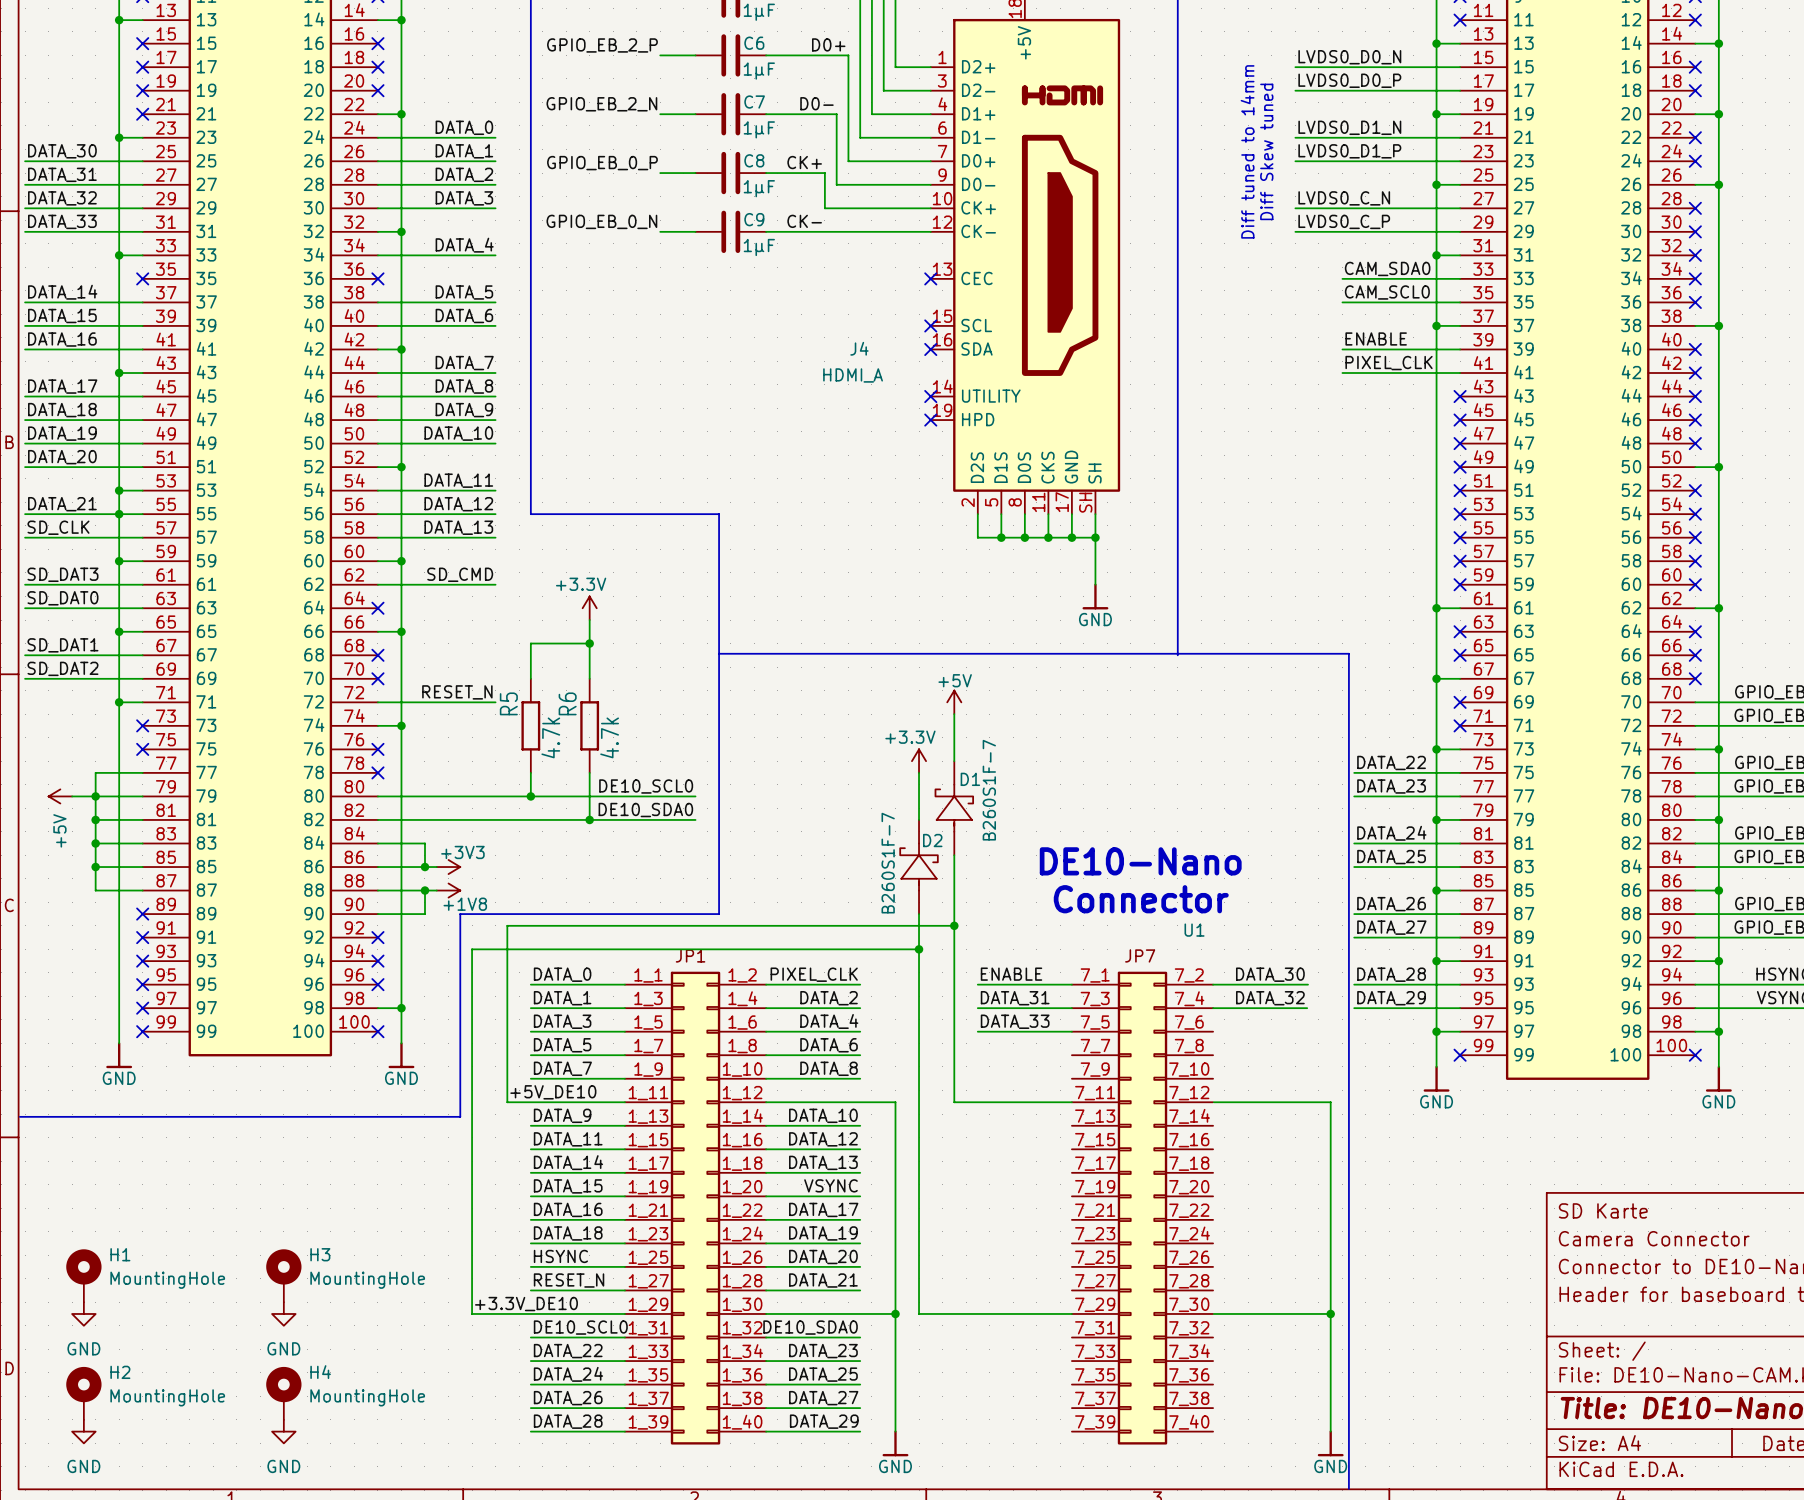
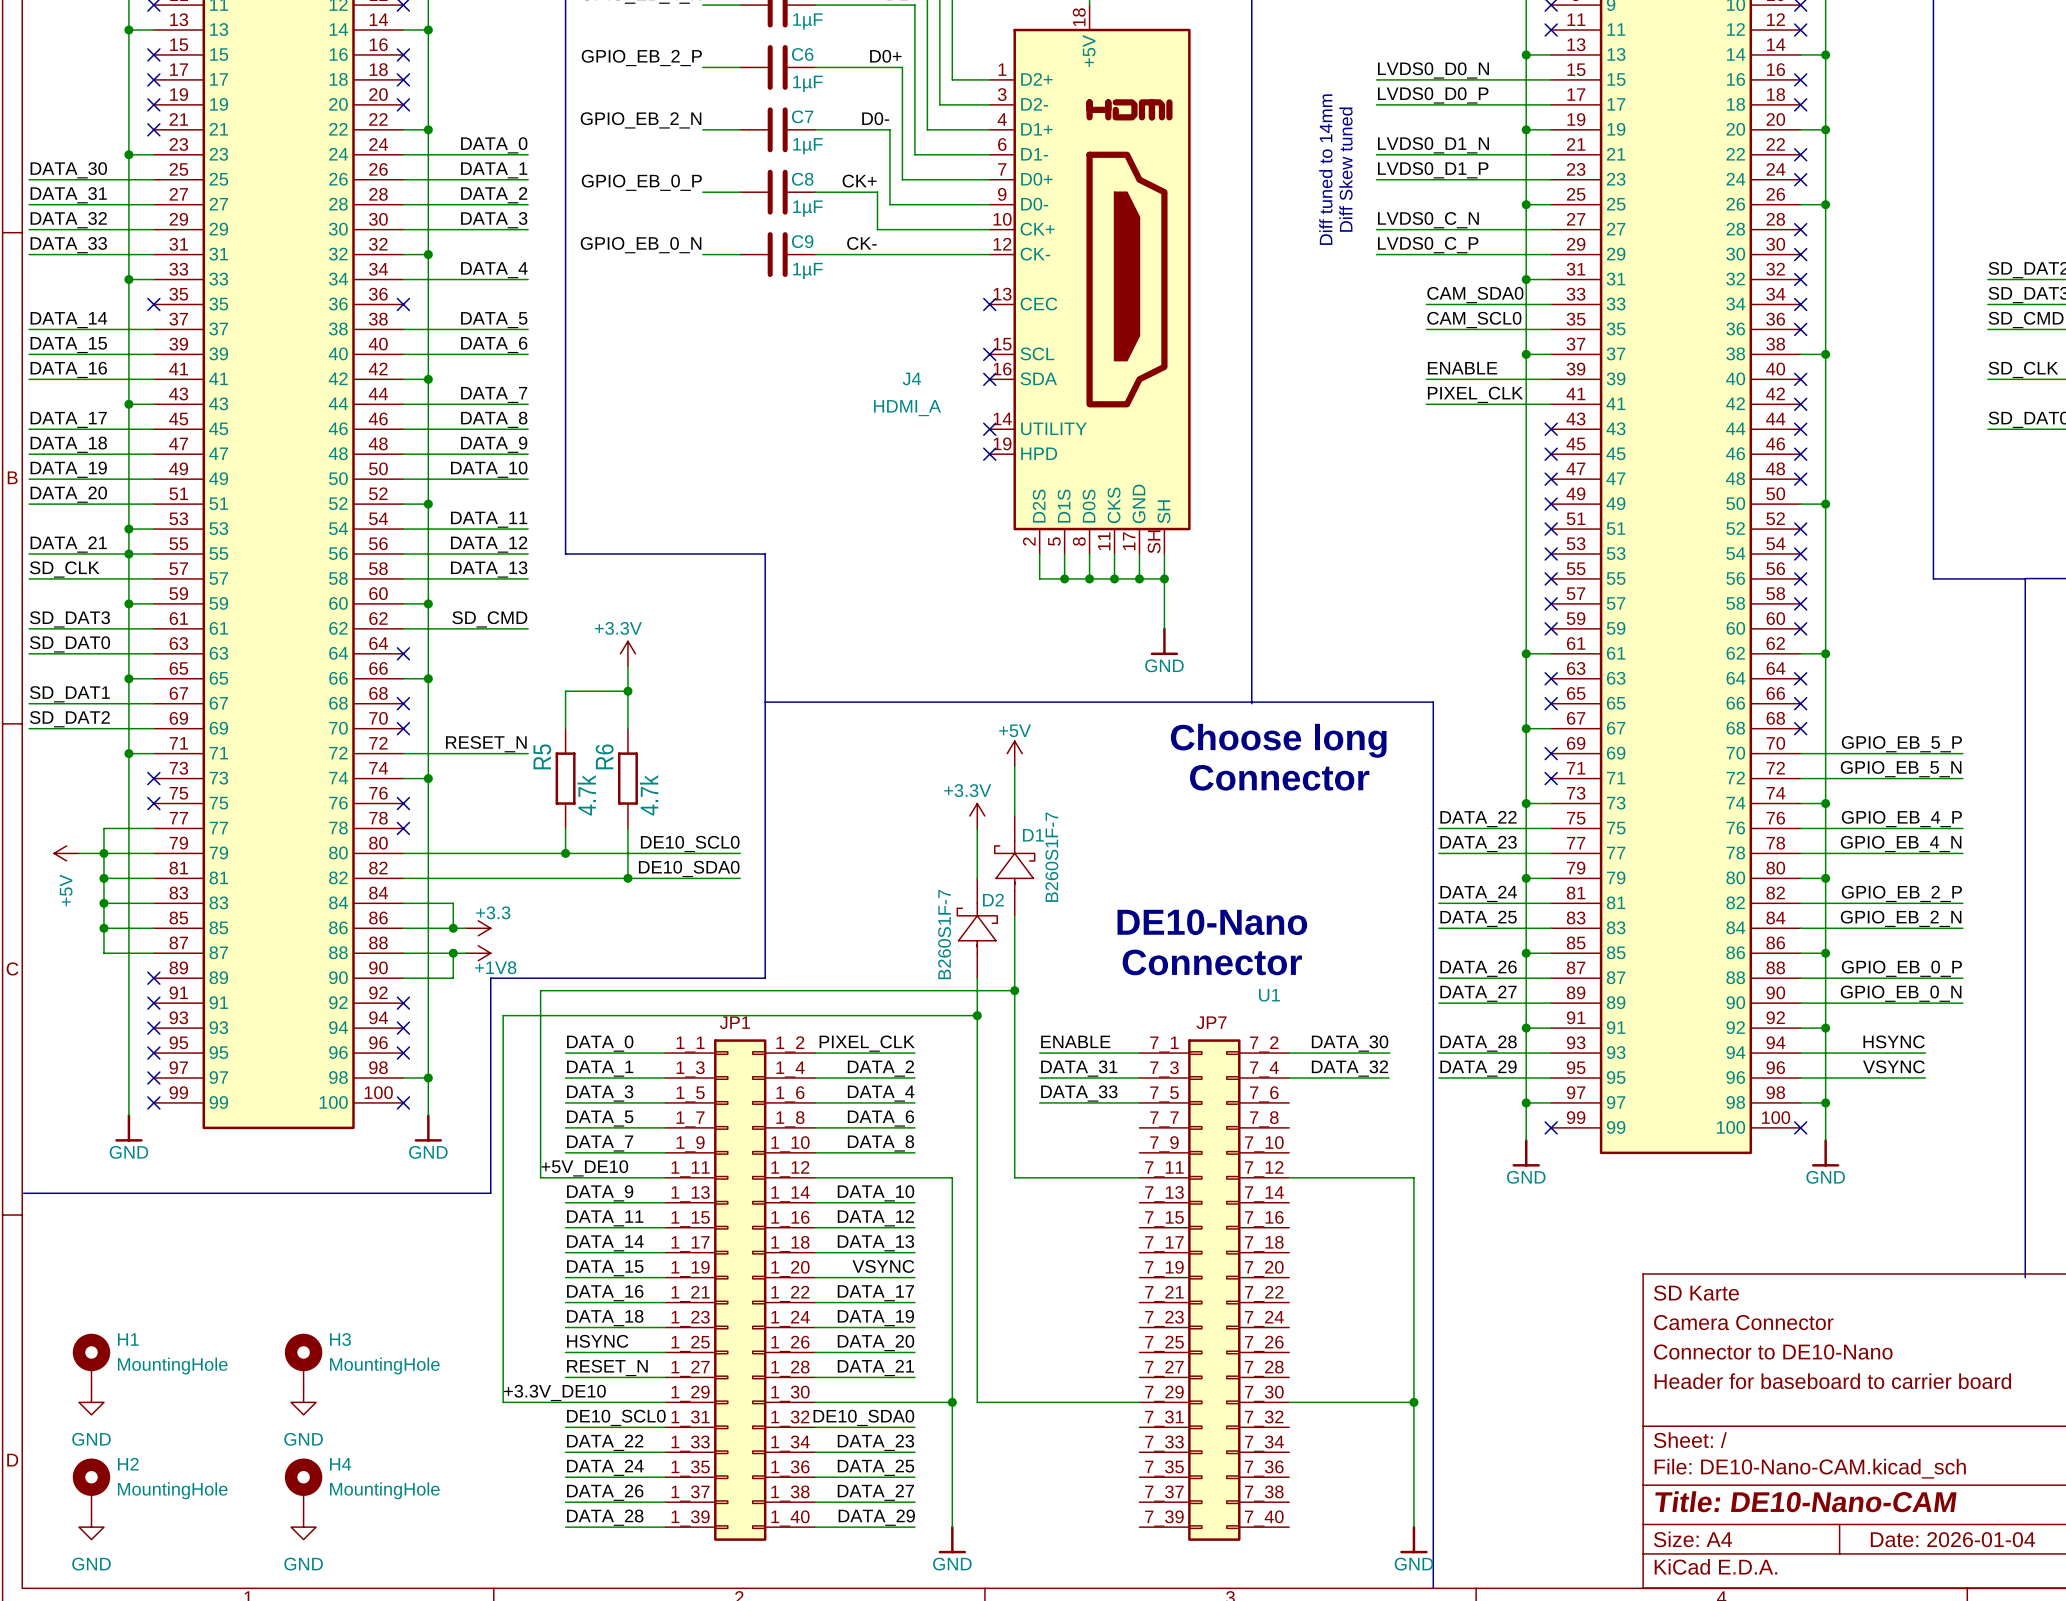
text: none -> Choose long (1278, 740)
text: none -> Connector (1279, 777)
power symbol: +3V3 (448, 867) -> +3.3 (478, 928)

